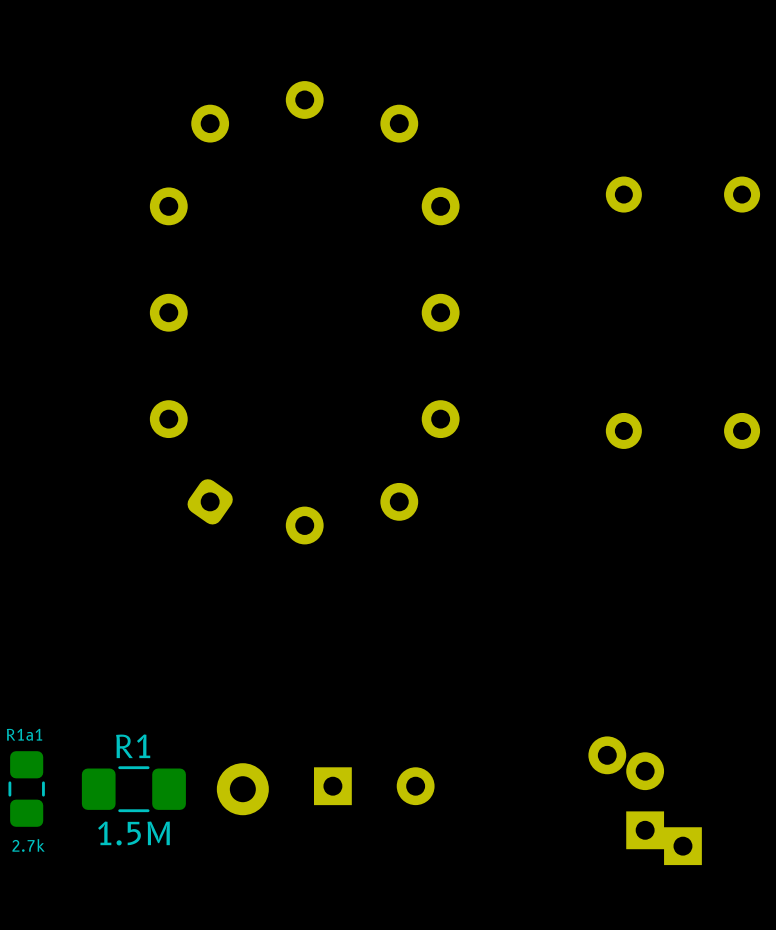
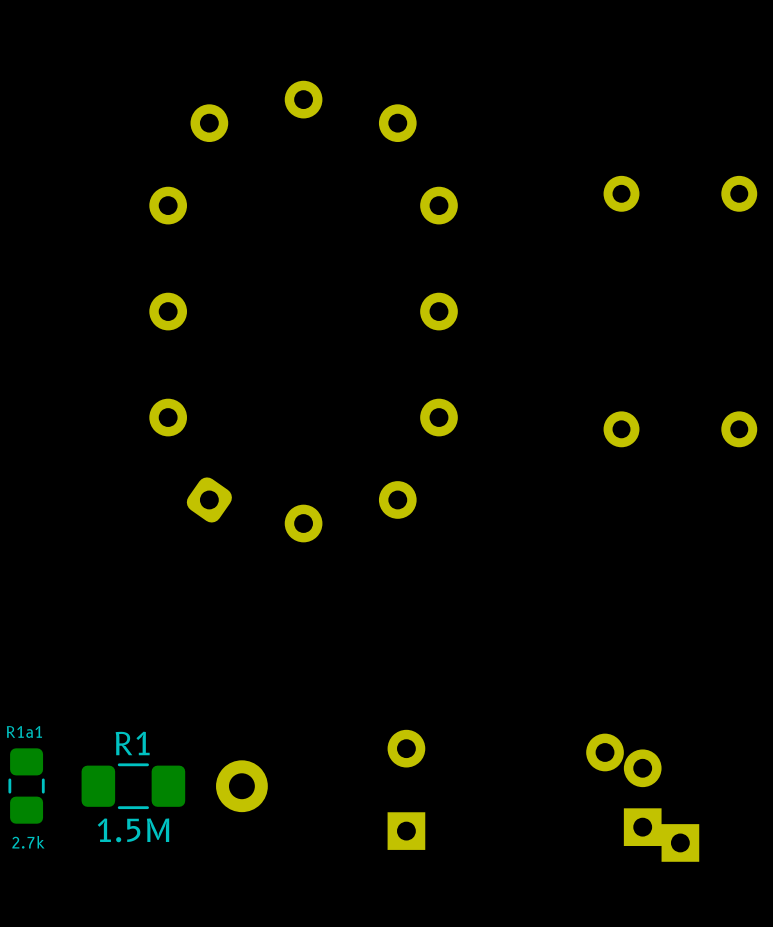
part rotation: 0° (374, 786) -> 90° counterclockwise (406, 789)

